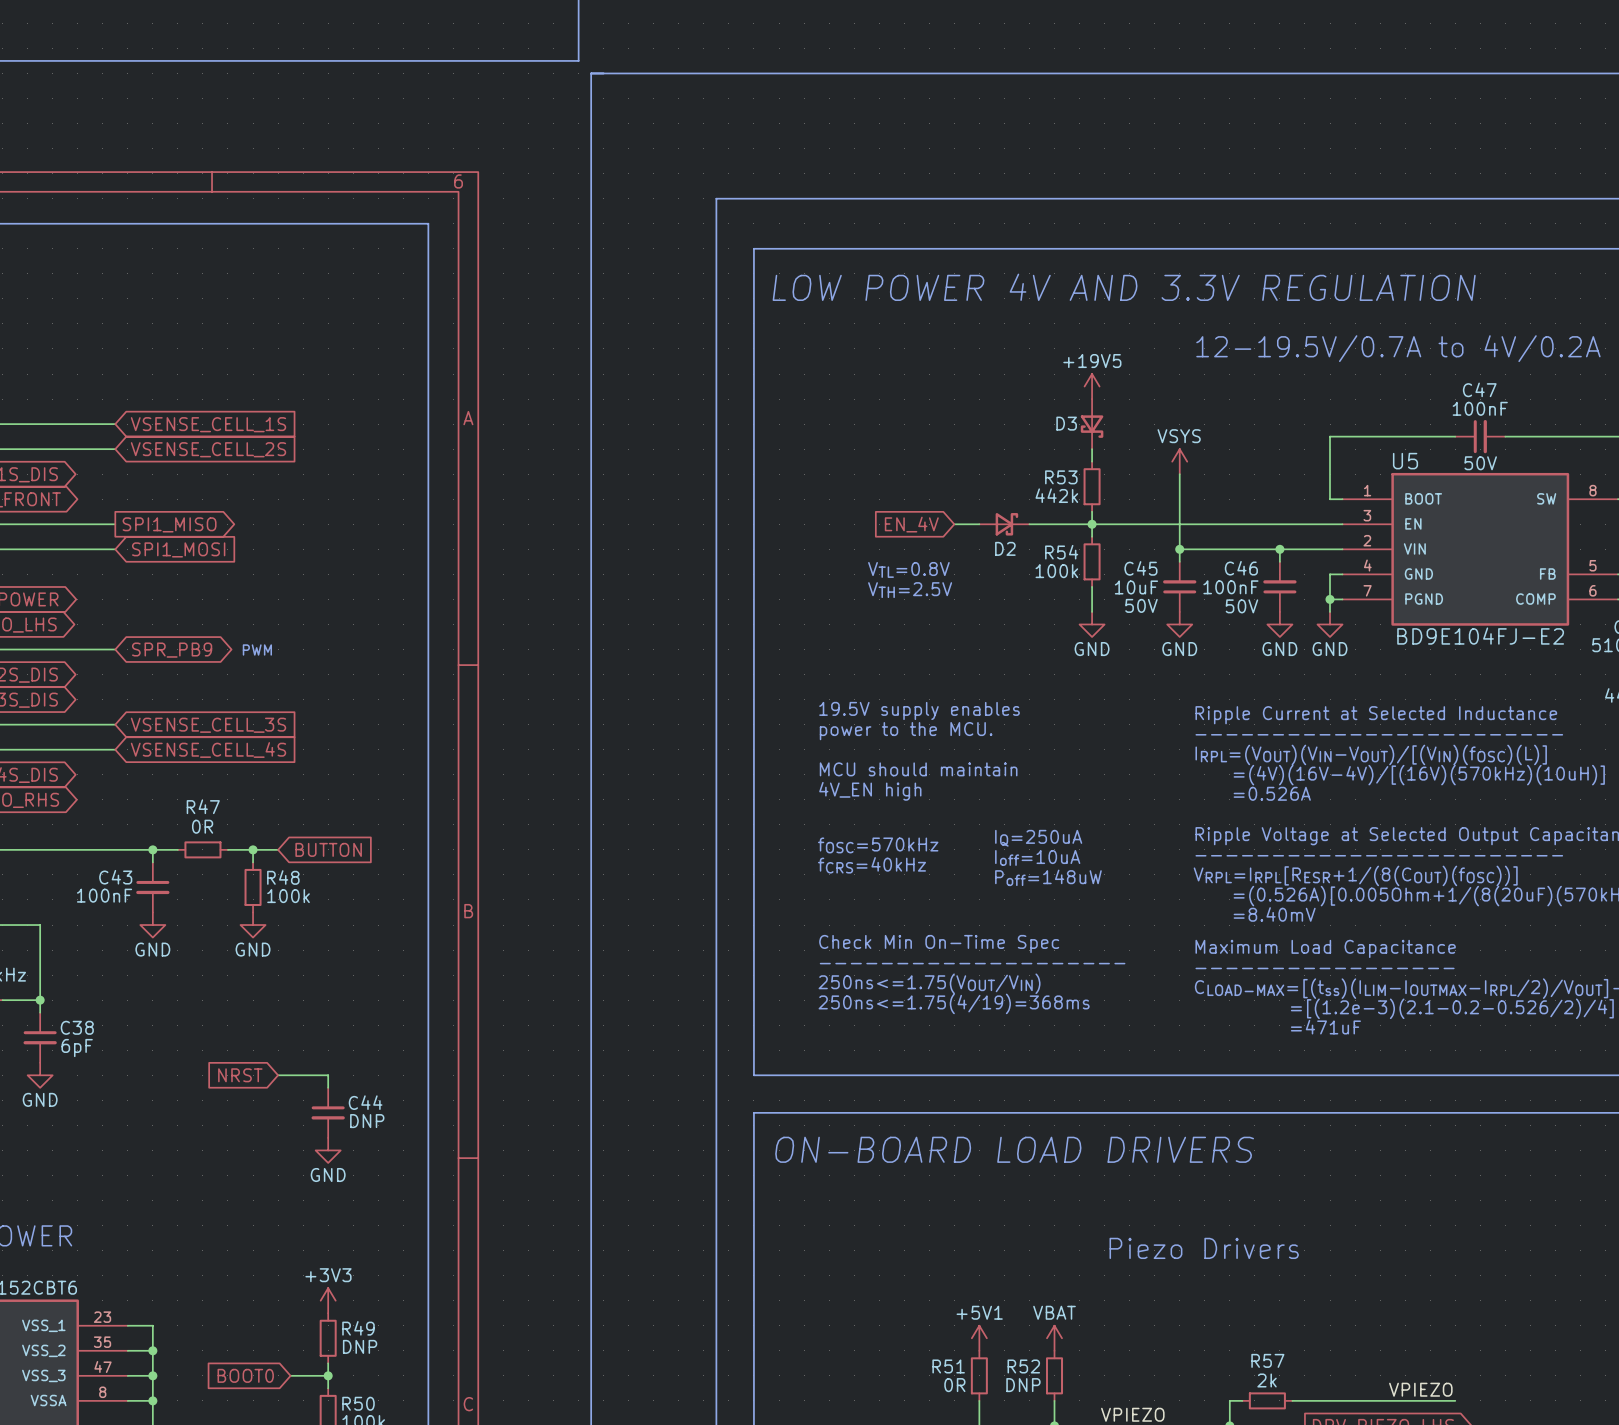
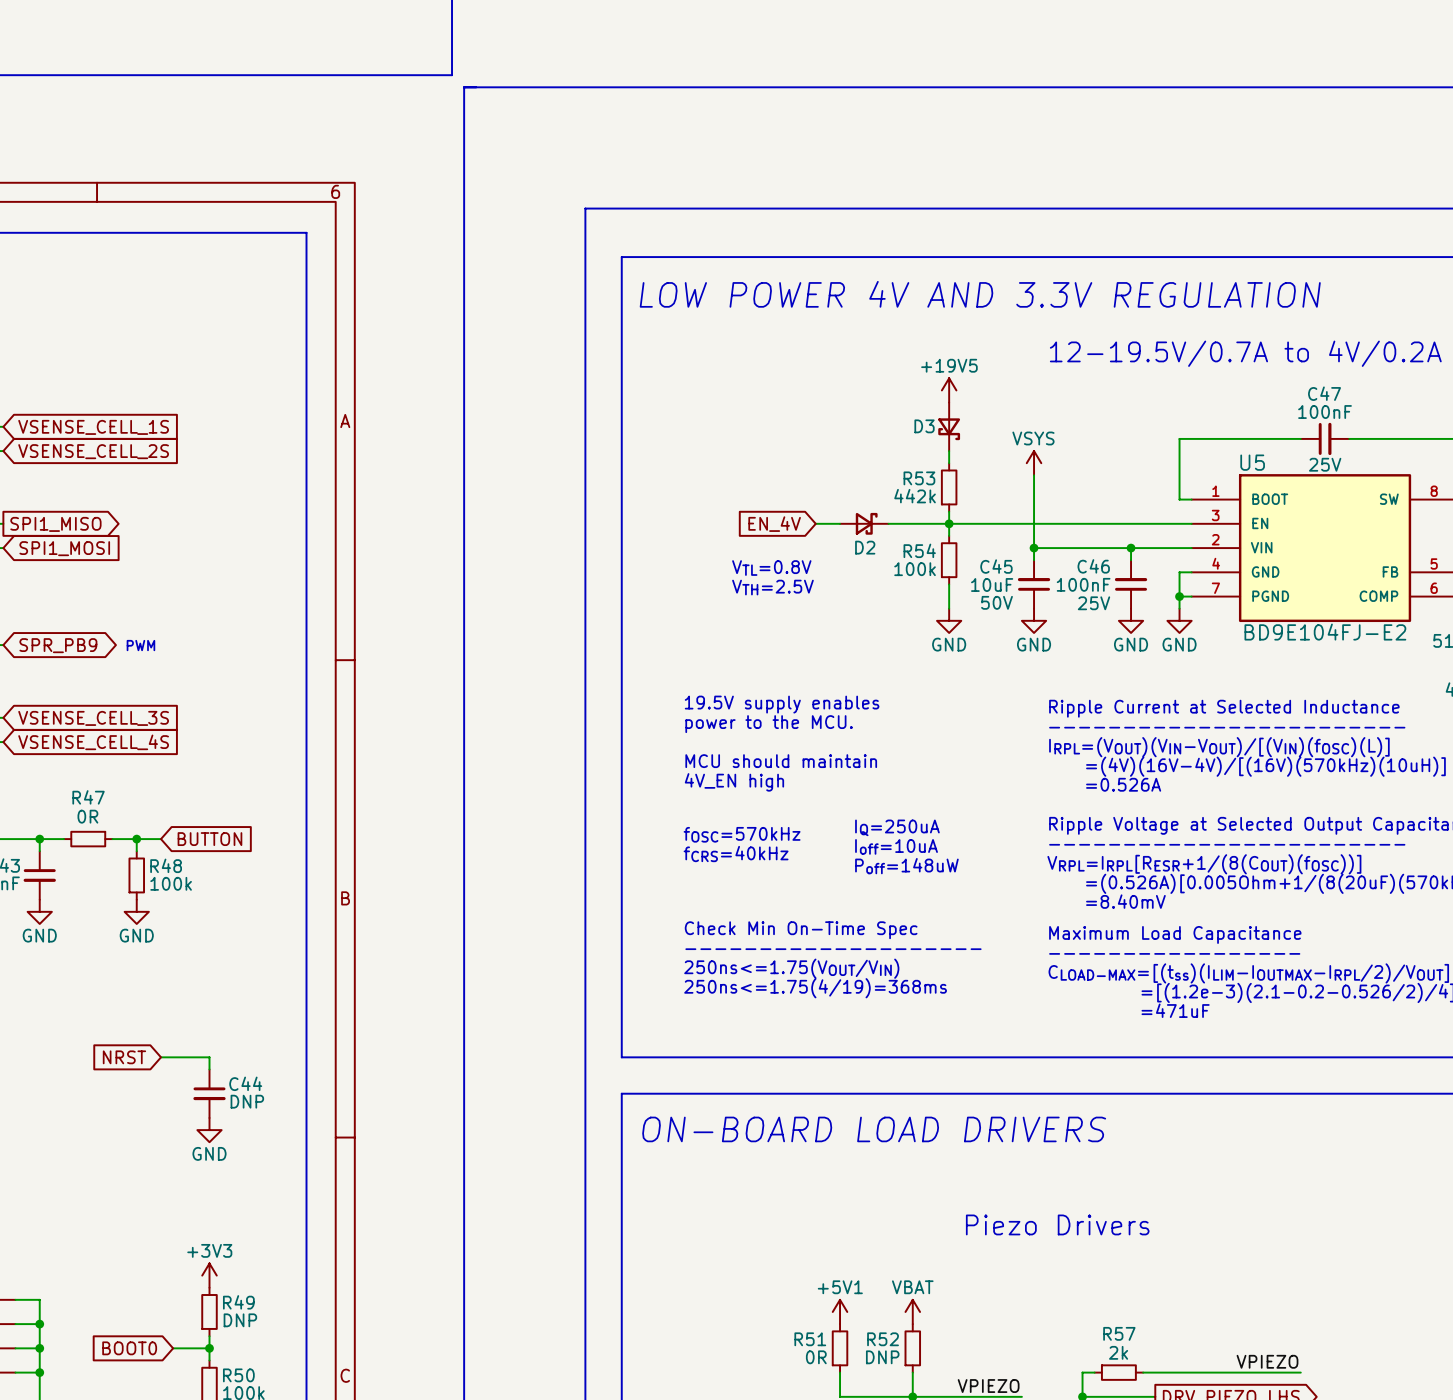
C47 text: 50V (1480, 463) -> 25V (1325, 464)
C46 text: 50V (1241, 606) -> 25V (1093, 603)

